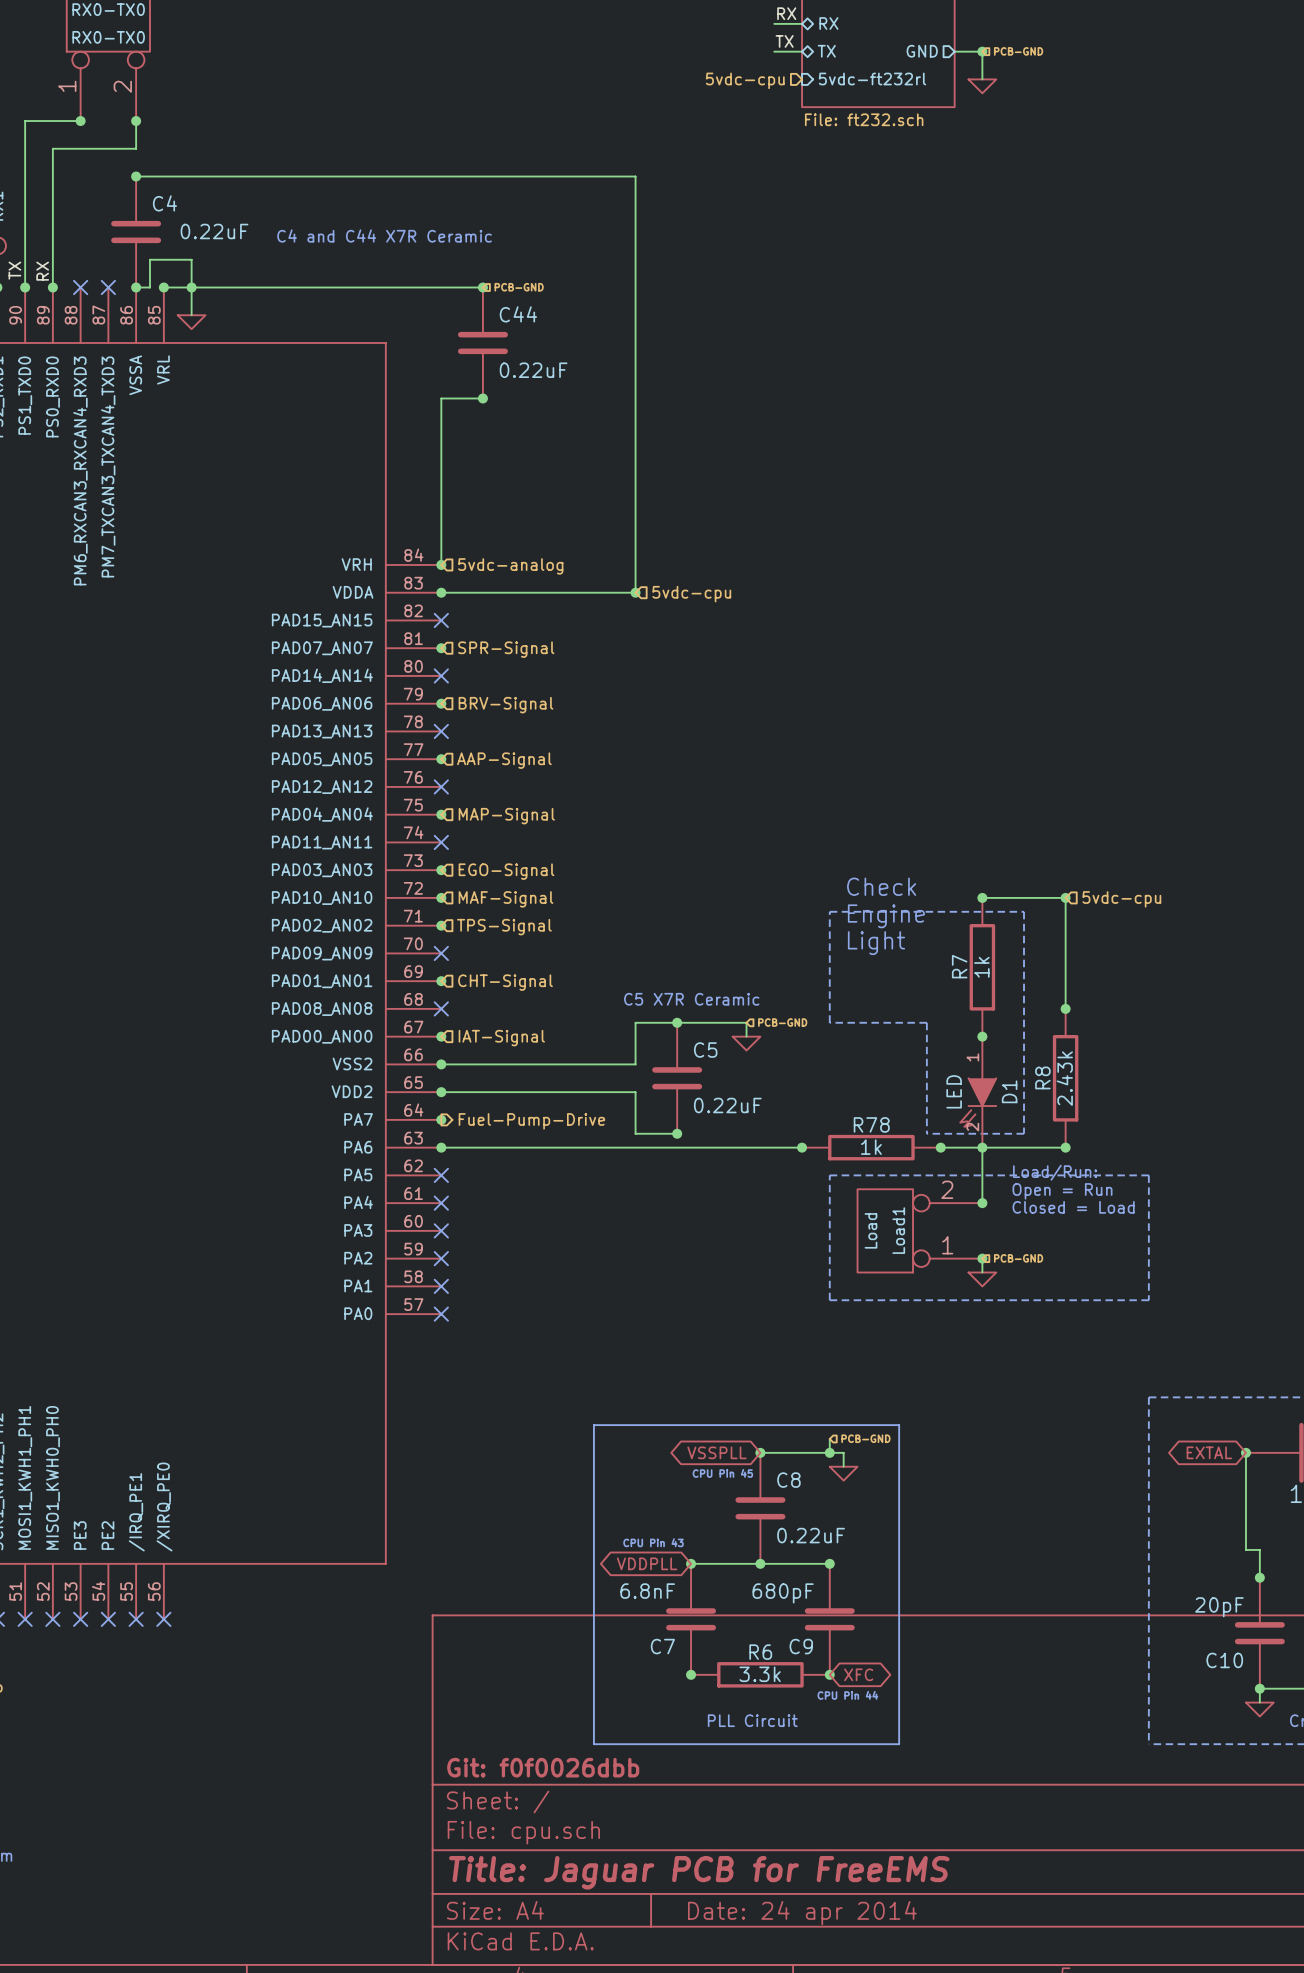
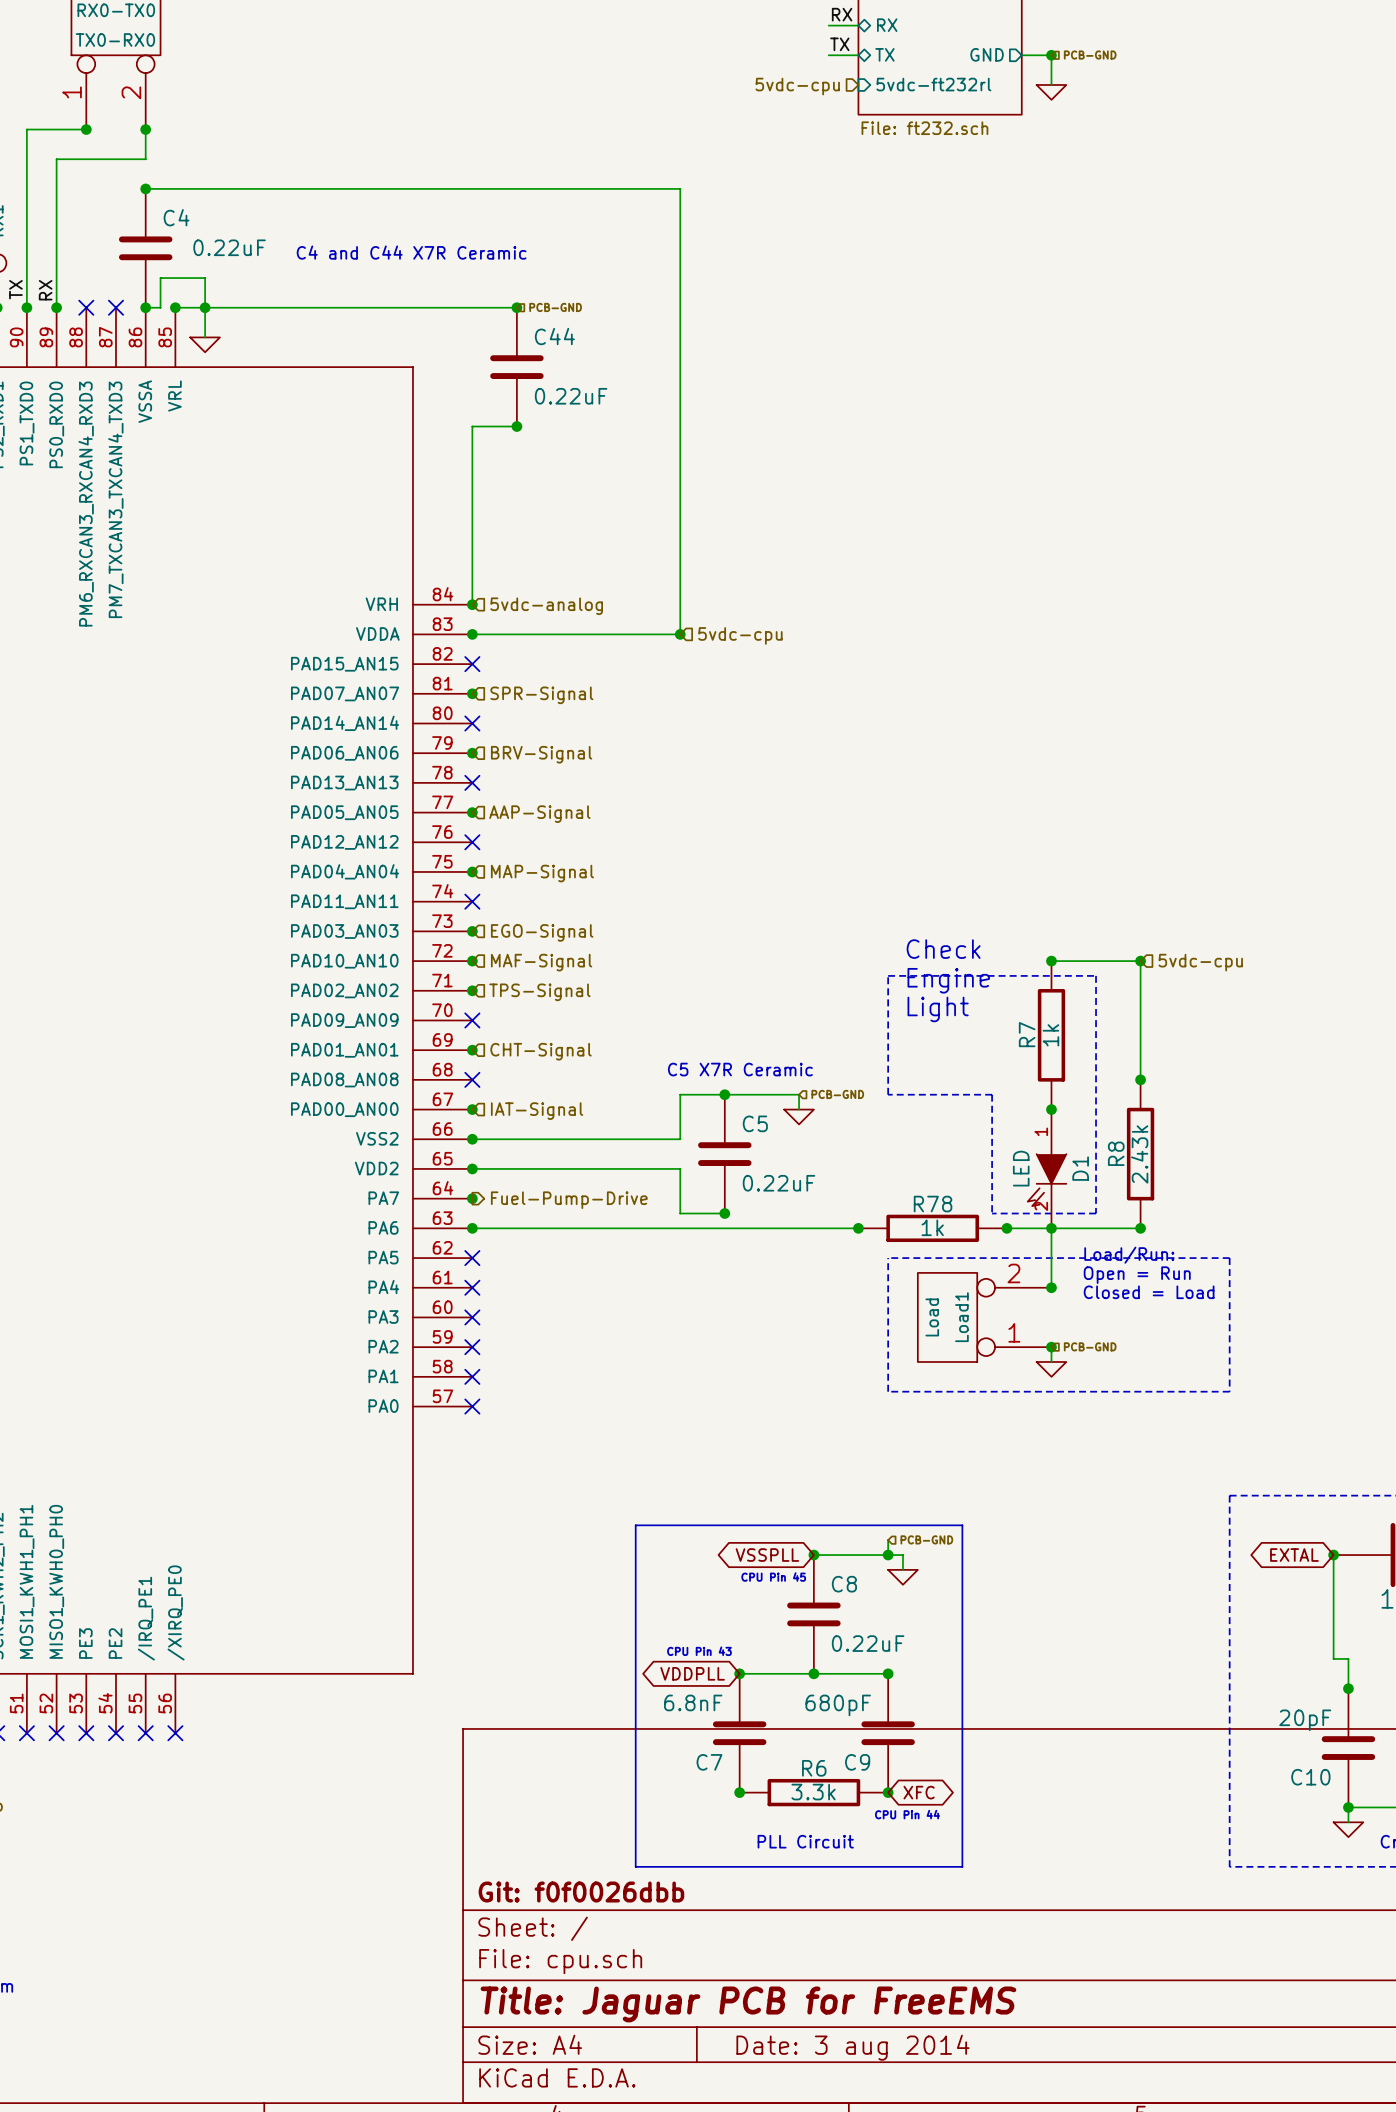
RX0-TX0 name: RX0-TX0 (108, 37) -> TX0-RX0 (115, 40)
title block: Date: 24 apr 2014 (802, 1913) -> Date: 3 aug 2014 (852, 2047)

